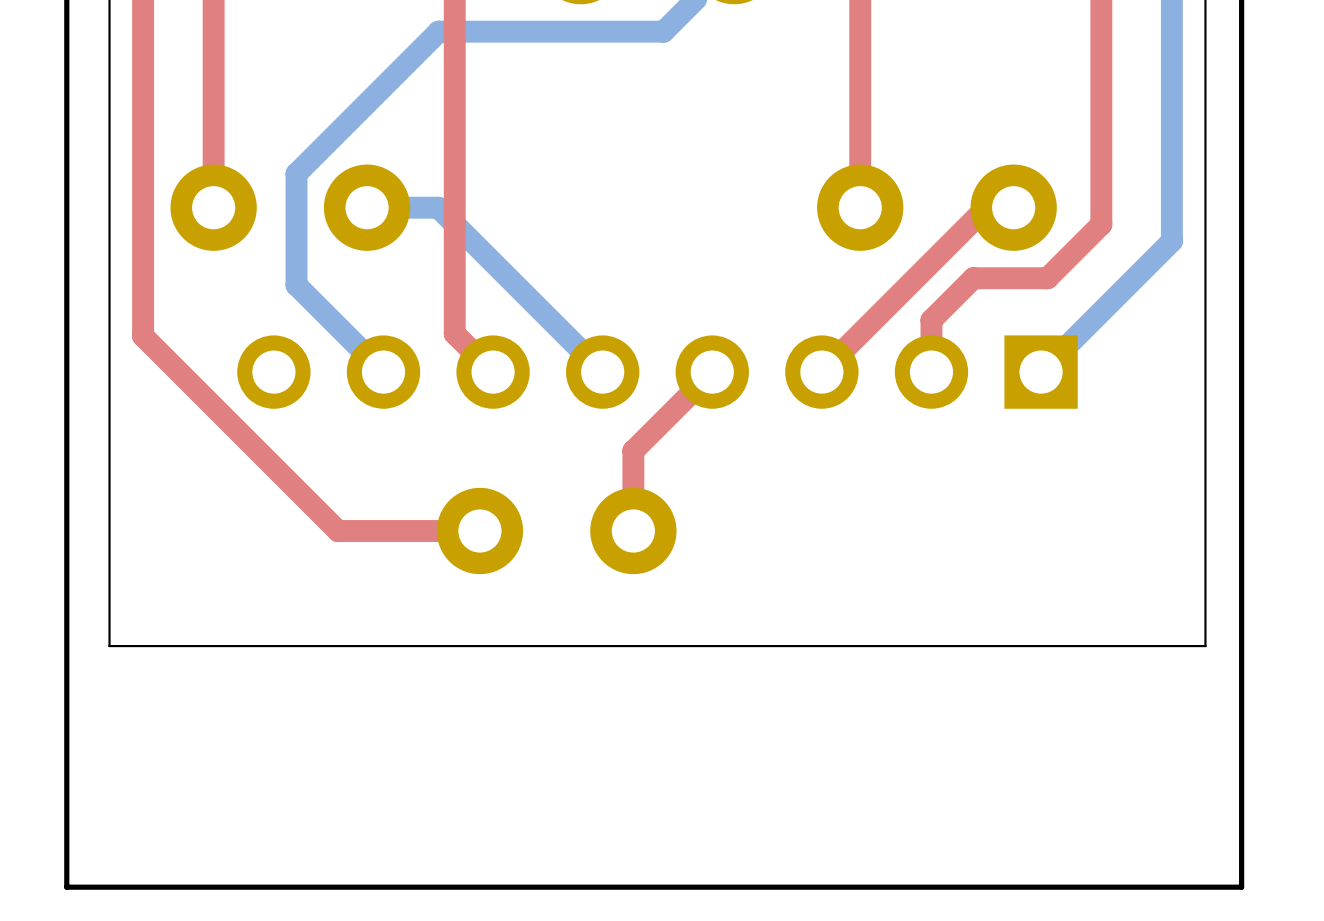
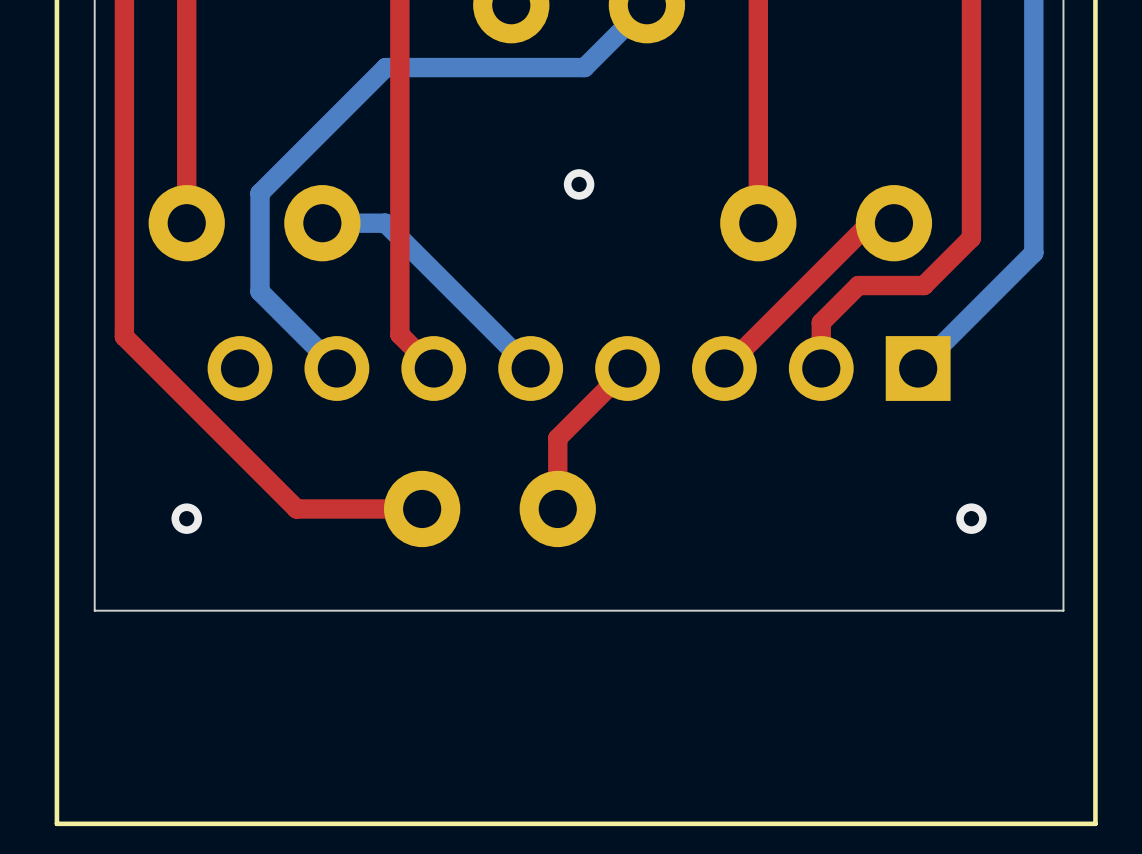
via: none -> (579, 184)
via: none -> (186, 518)
via: none -> (971, 518)

